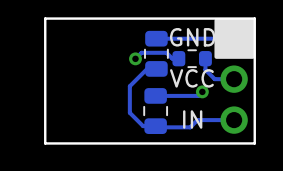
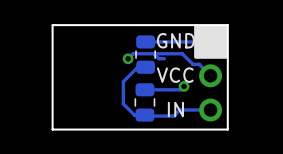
part: (192, 58) -> none
track: (205, 58) (205, 69) (214, 79) (234, 79) -> (154, 53) (182, 53) (192, 64) (199, 64) (210, 75)

